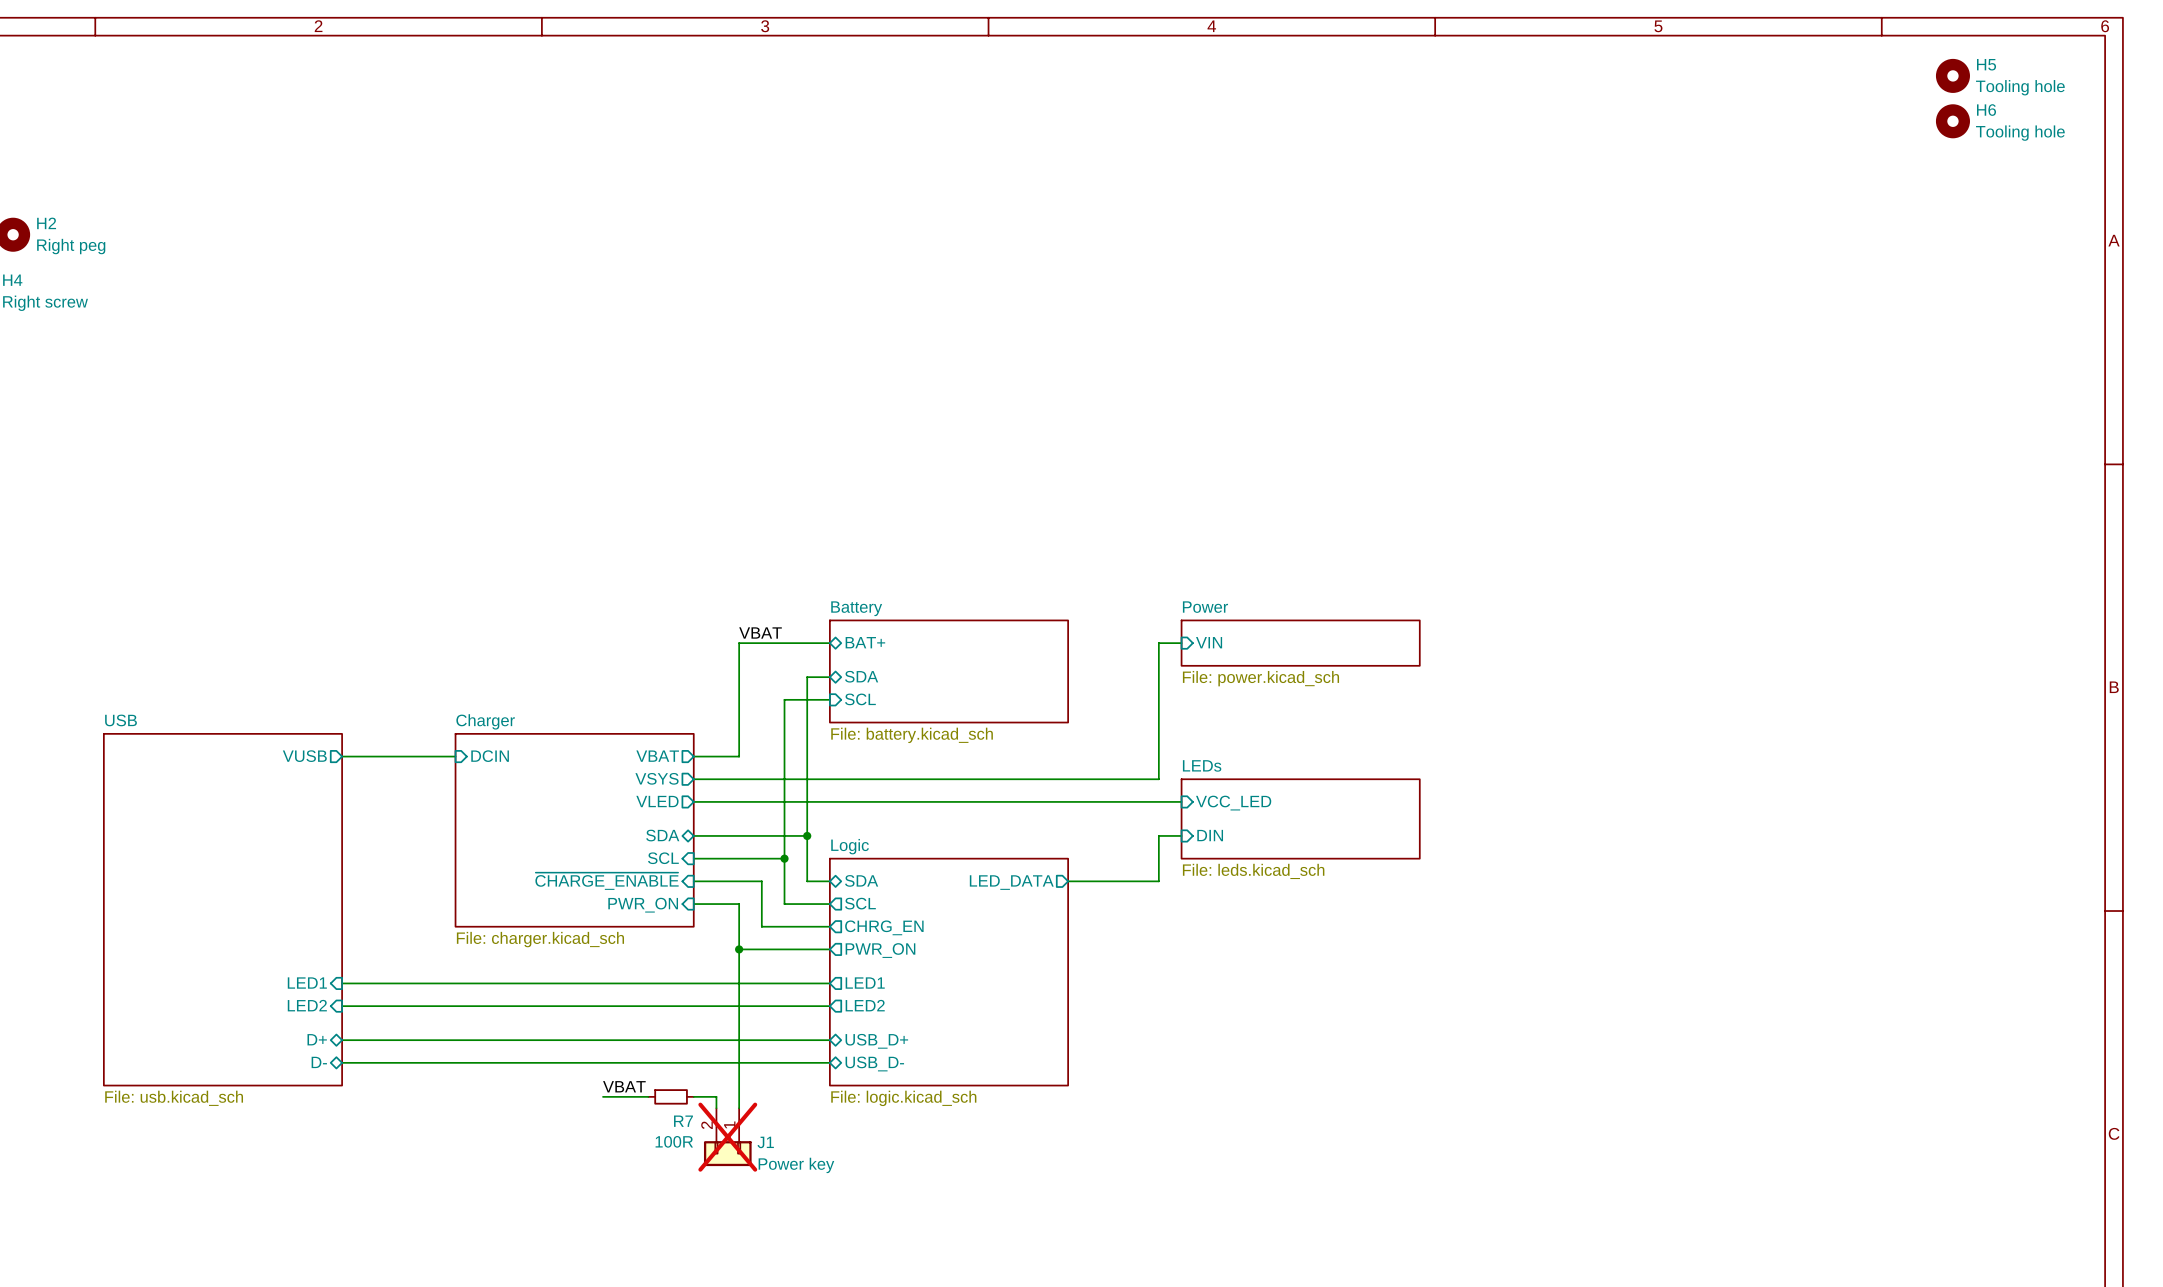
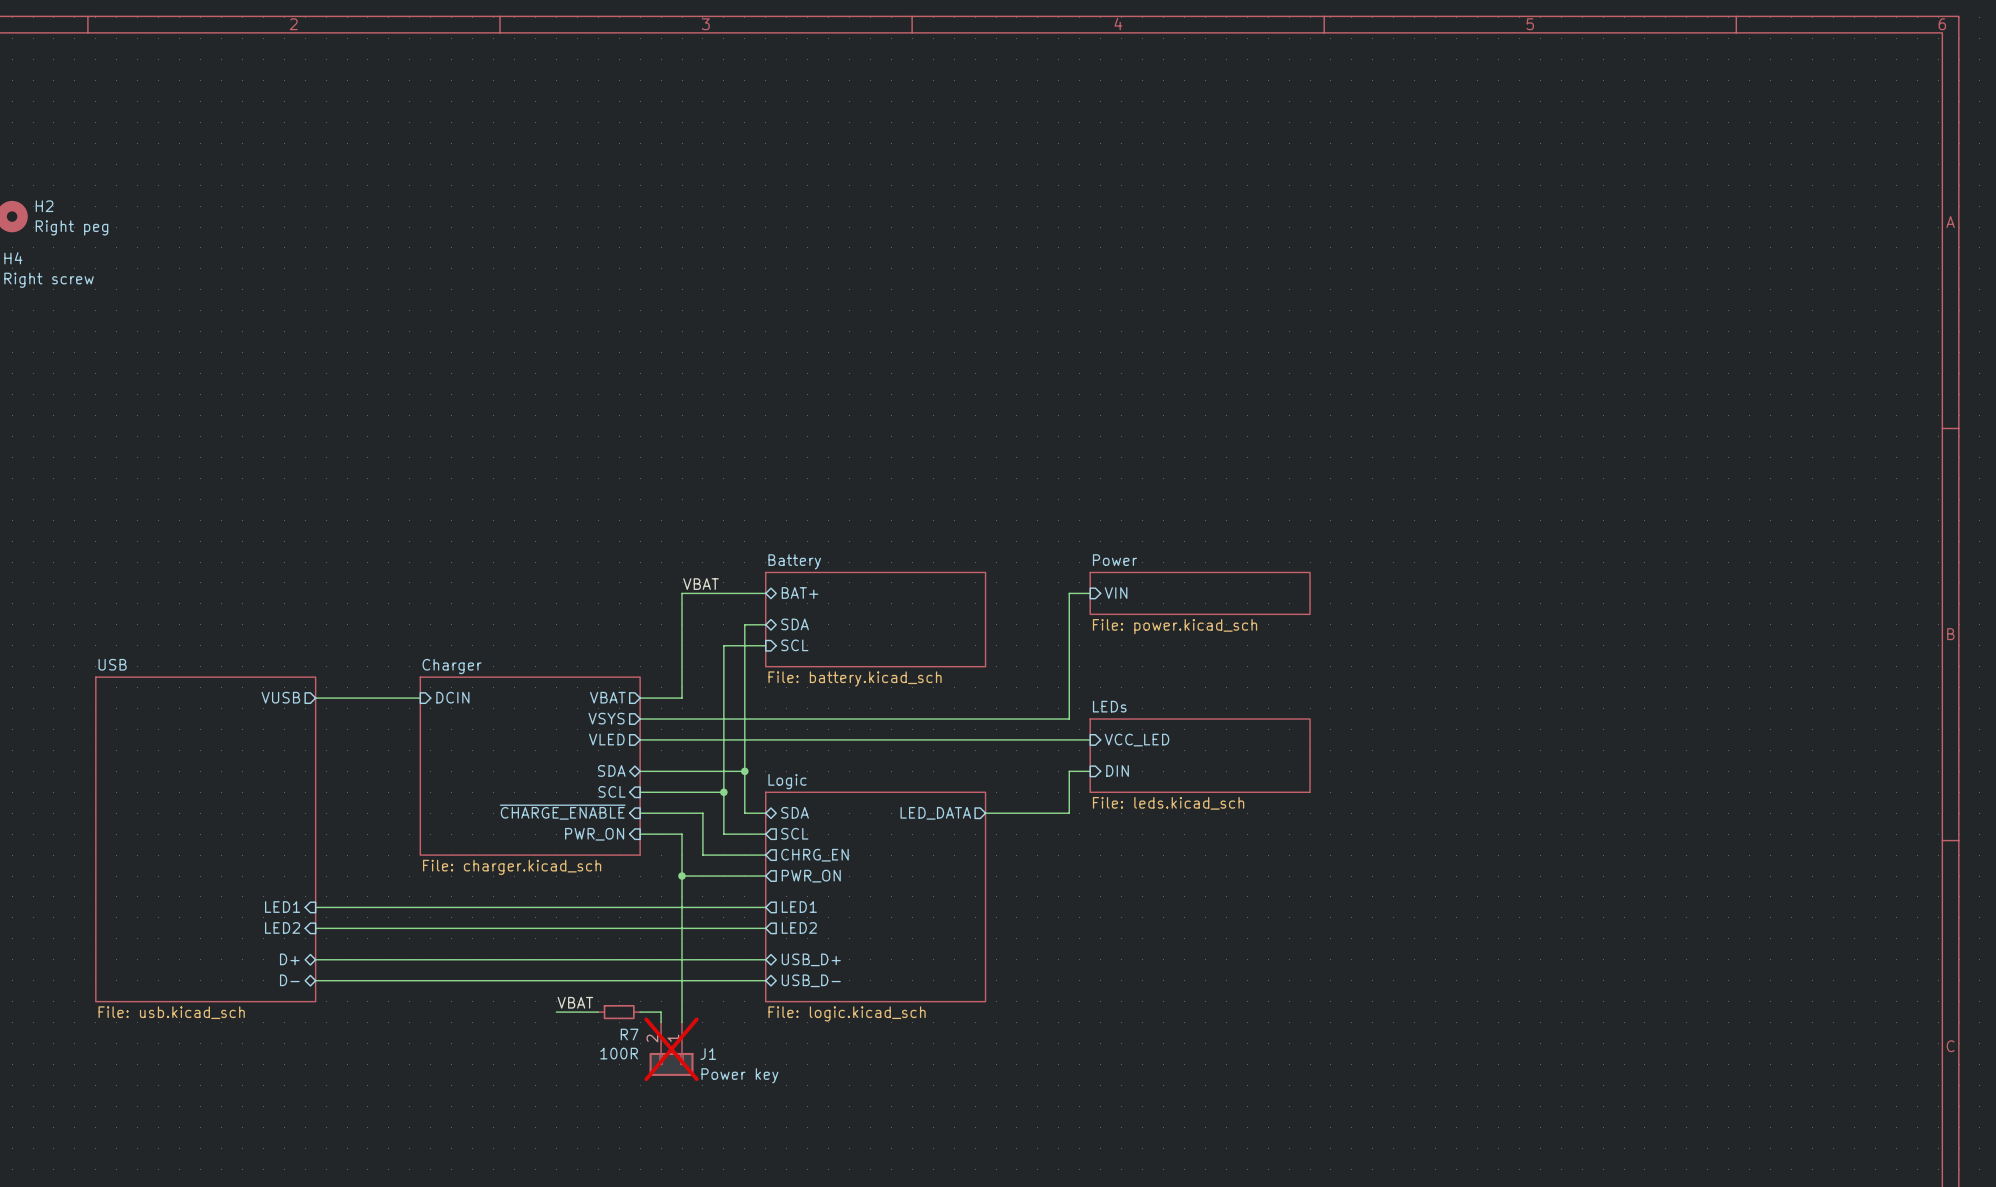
H5: Tooling hole (1952, 75) -> none
H6: Tooling hole (1952, 121) -> none

